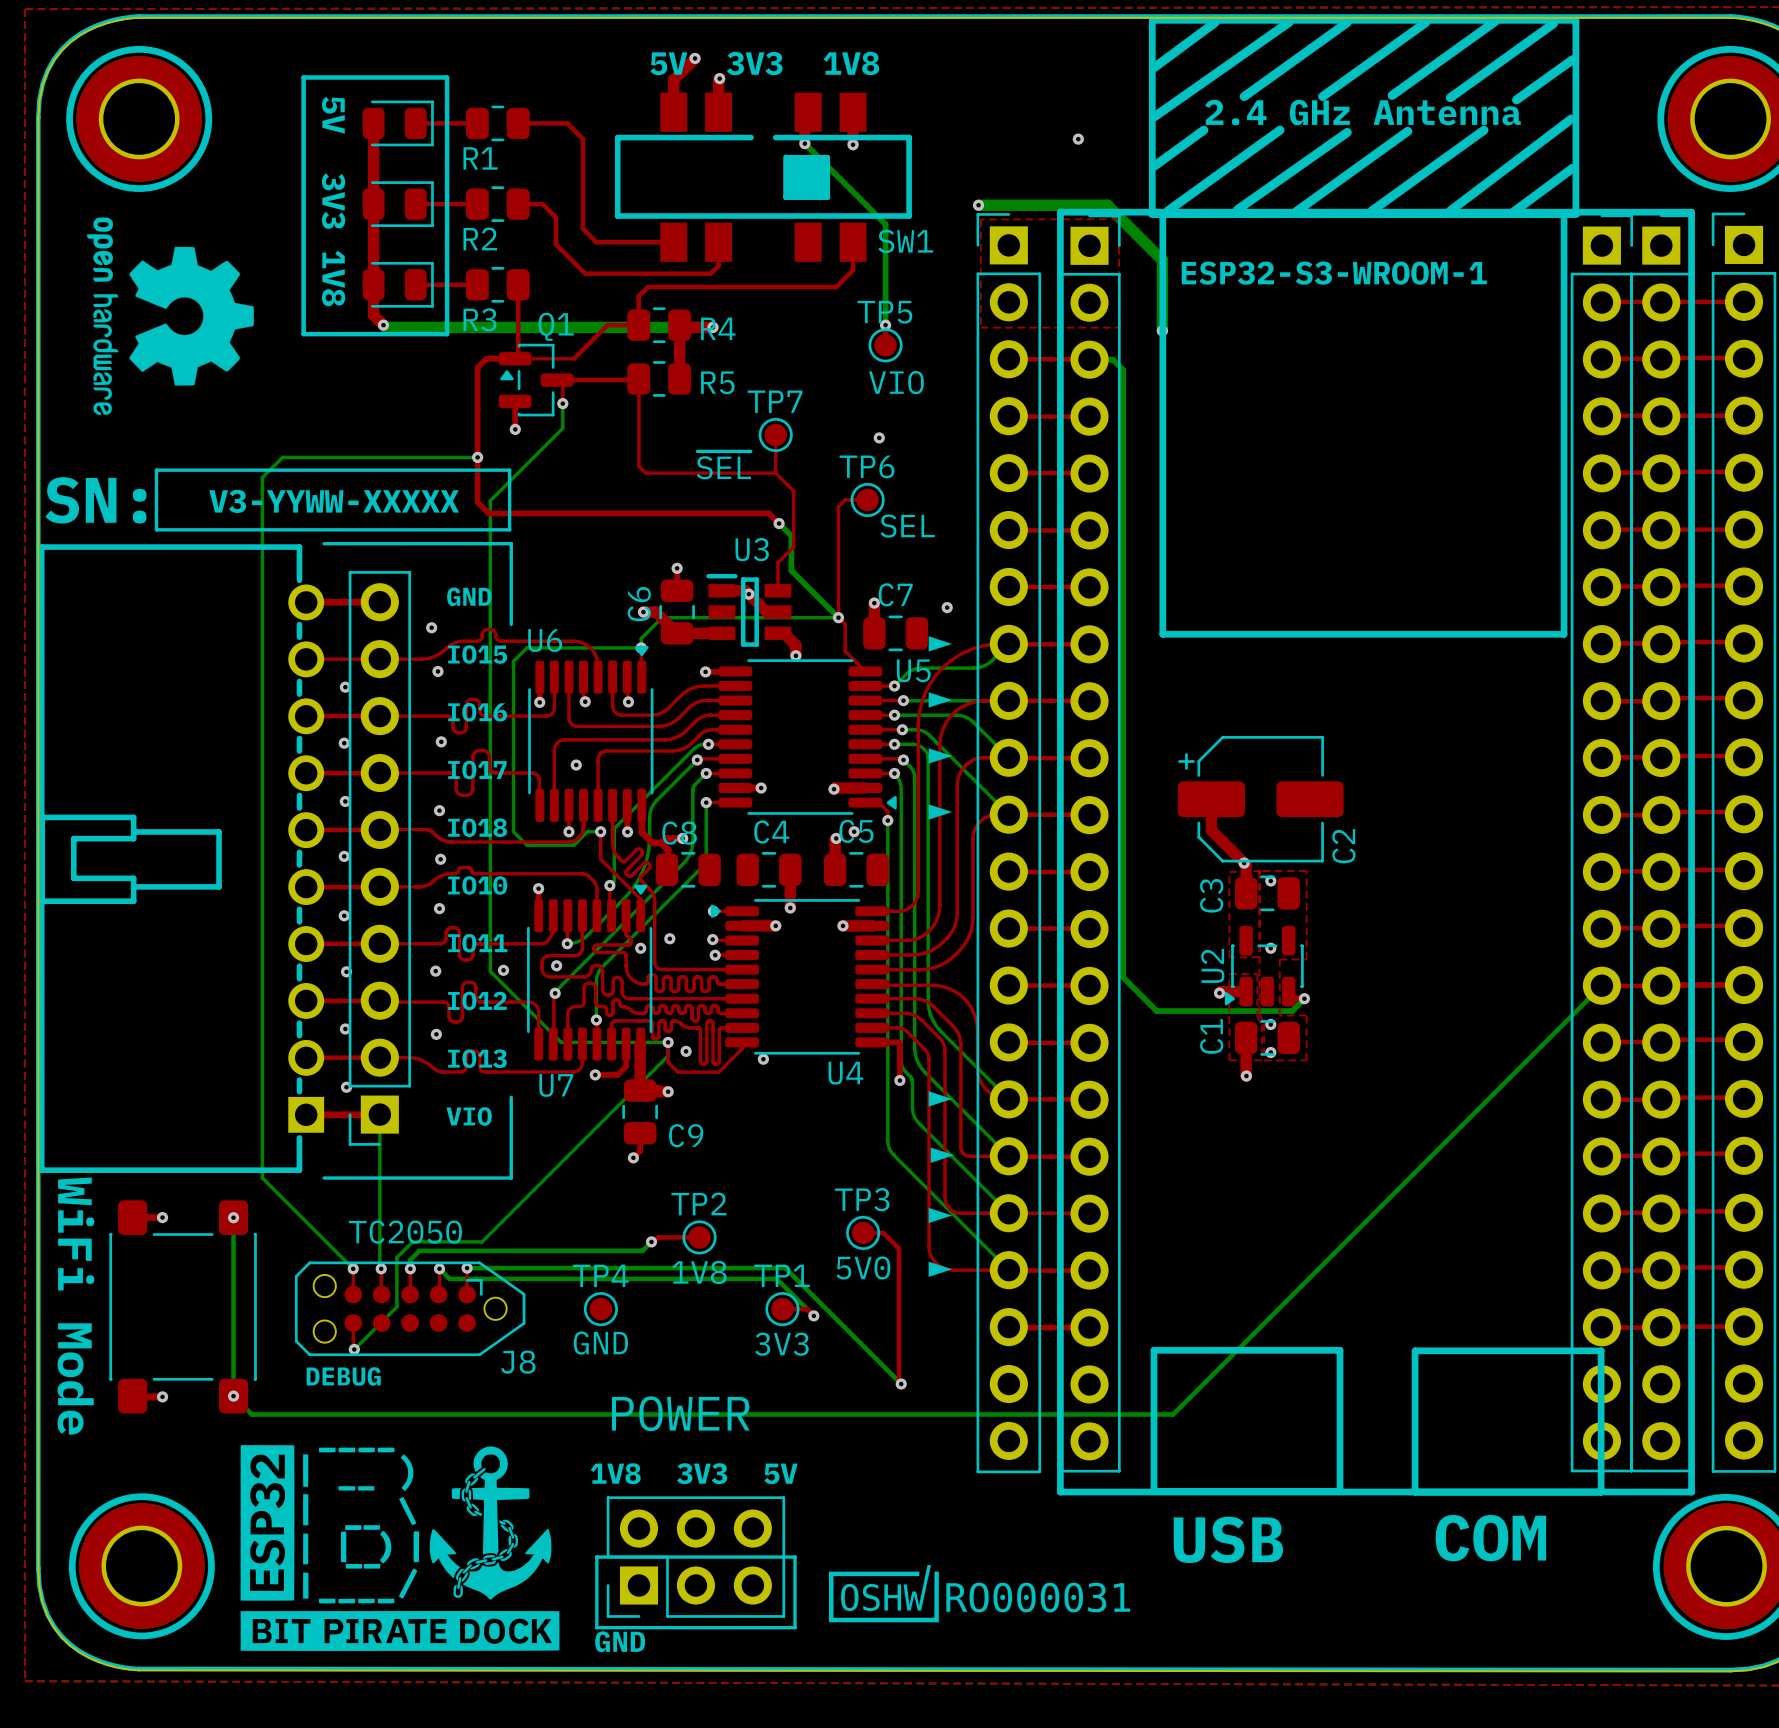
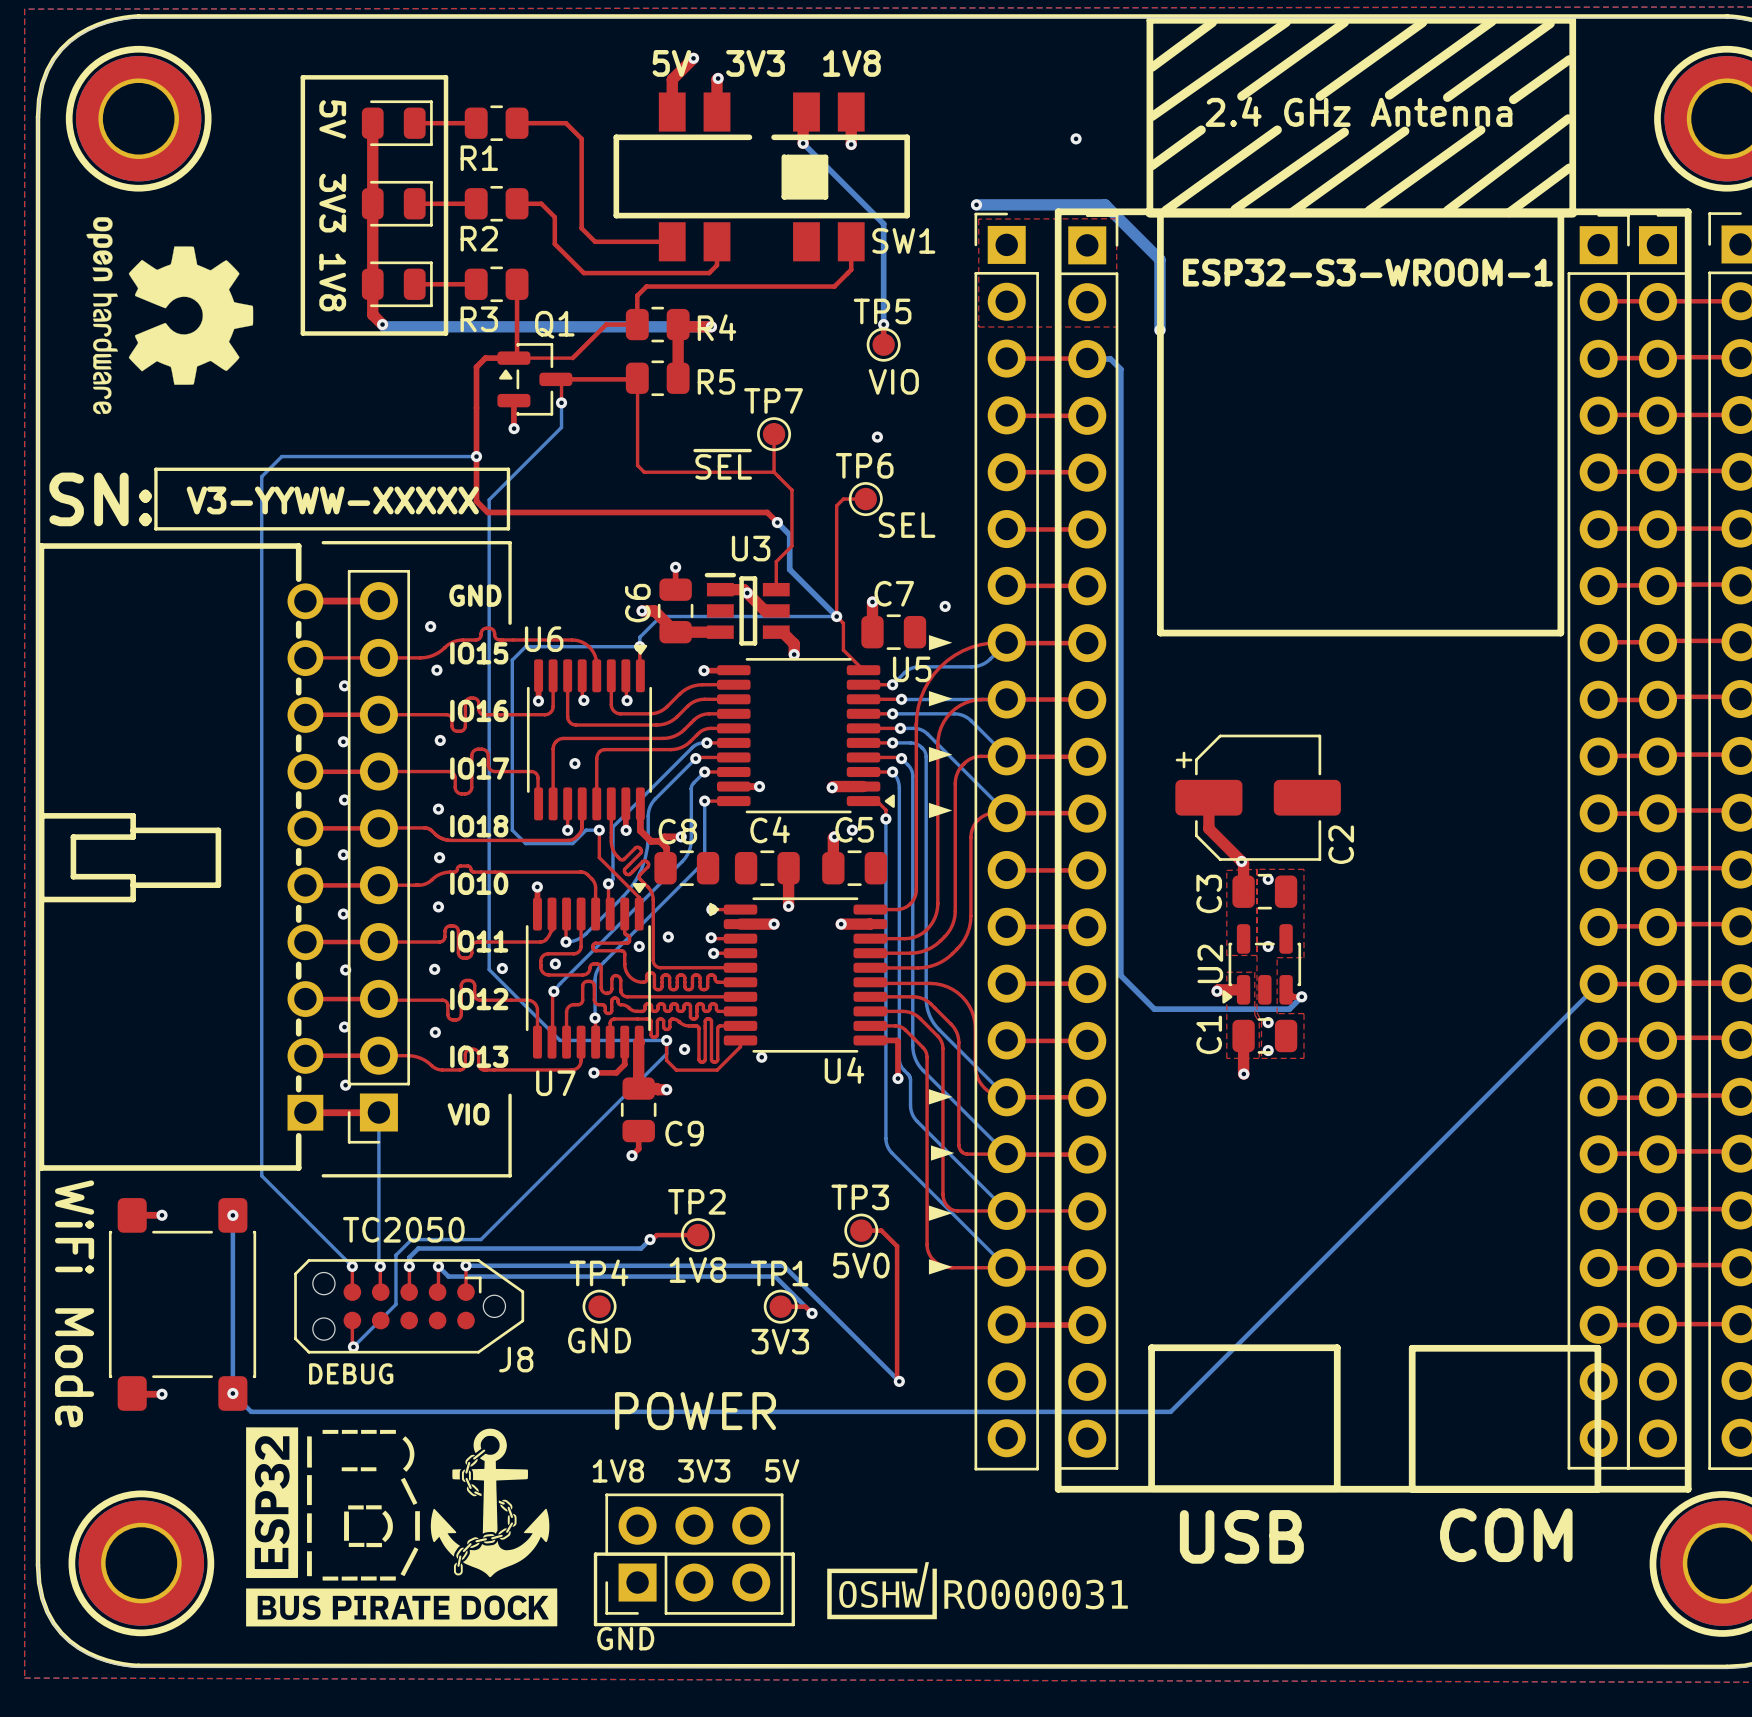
drawing shape: [236, 1428, 560, 1651] -> [246, 1427, 558, 1627]

